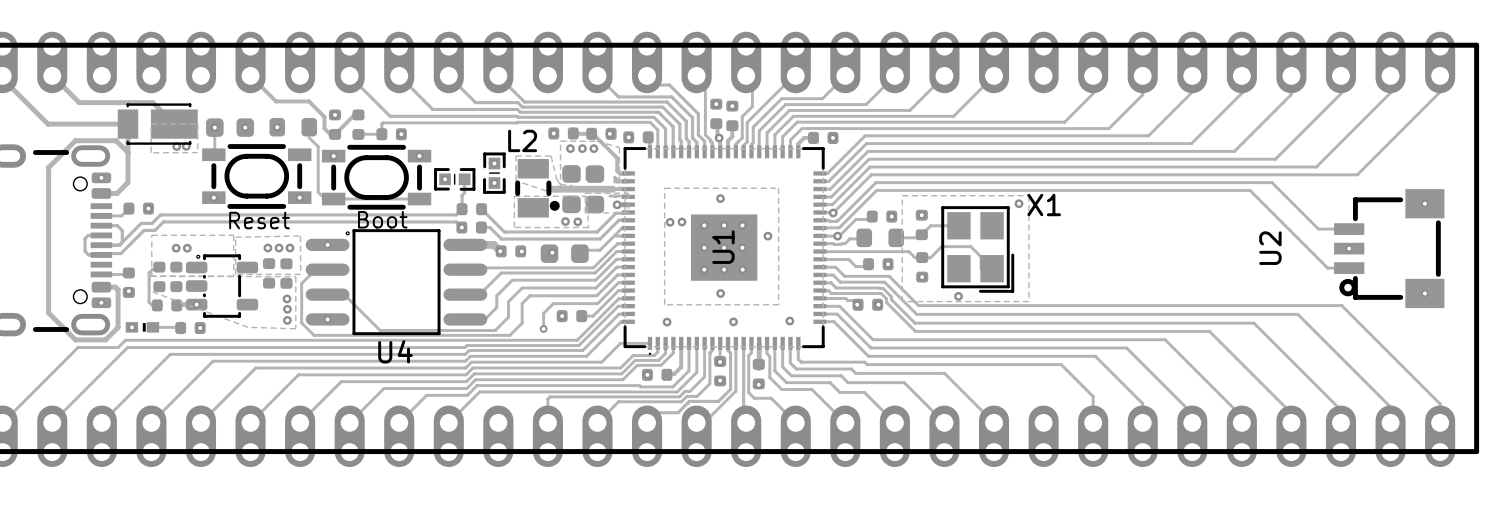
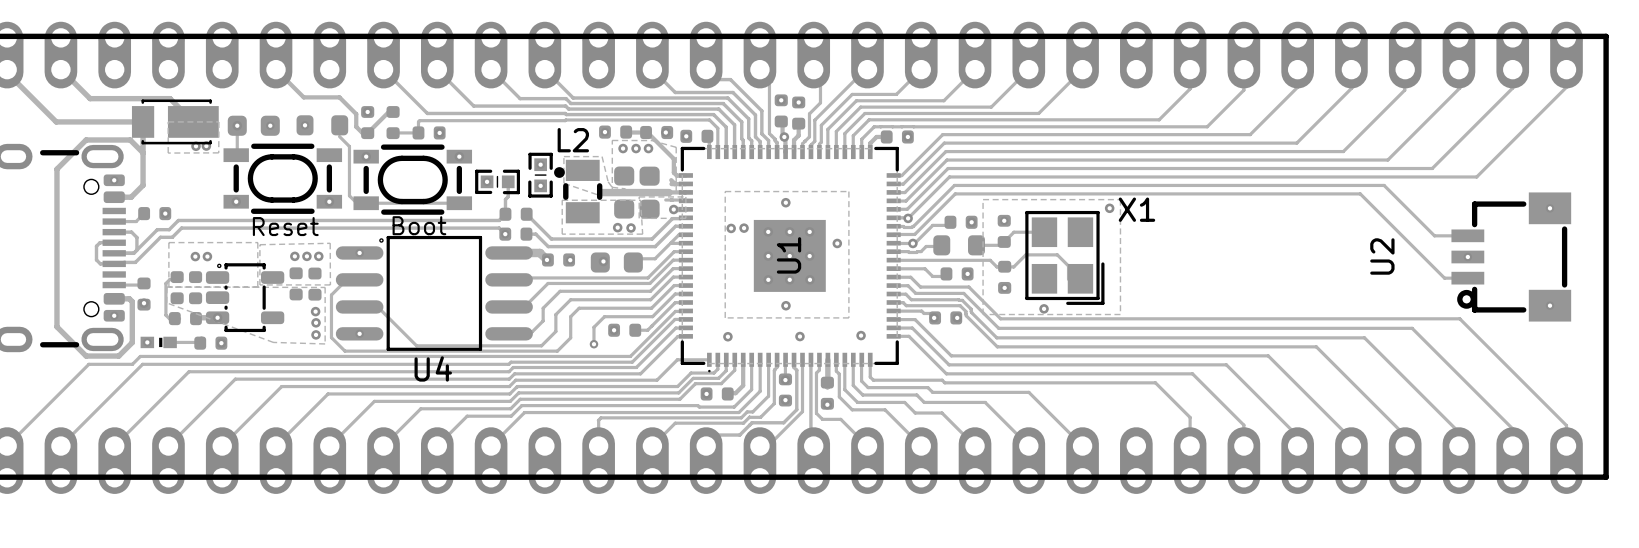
L2 rotation: 0° (537, 188) -> 180° (578, 191)

